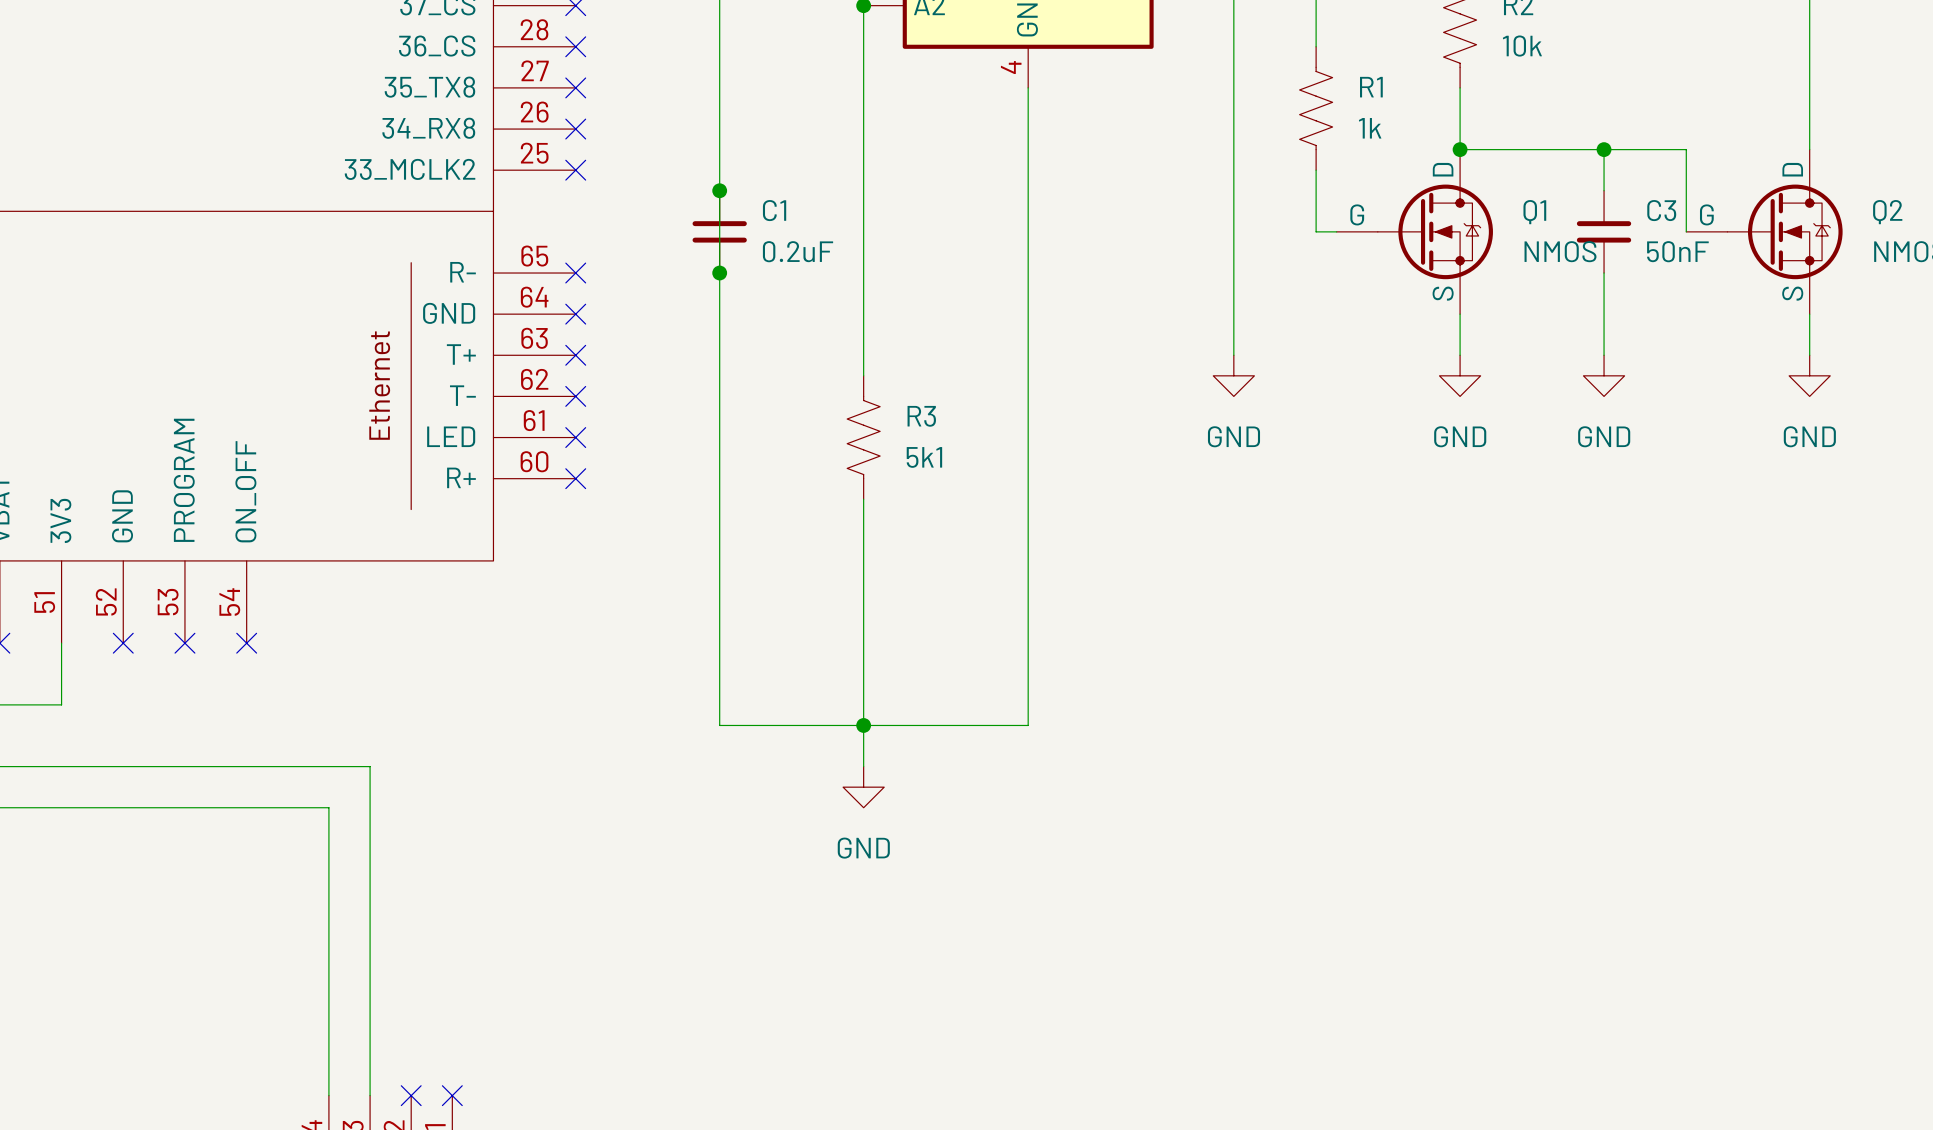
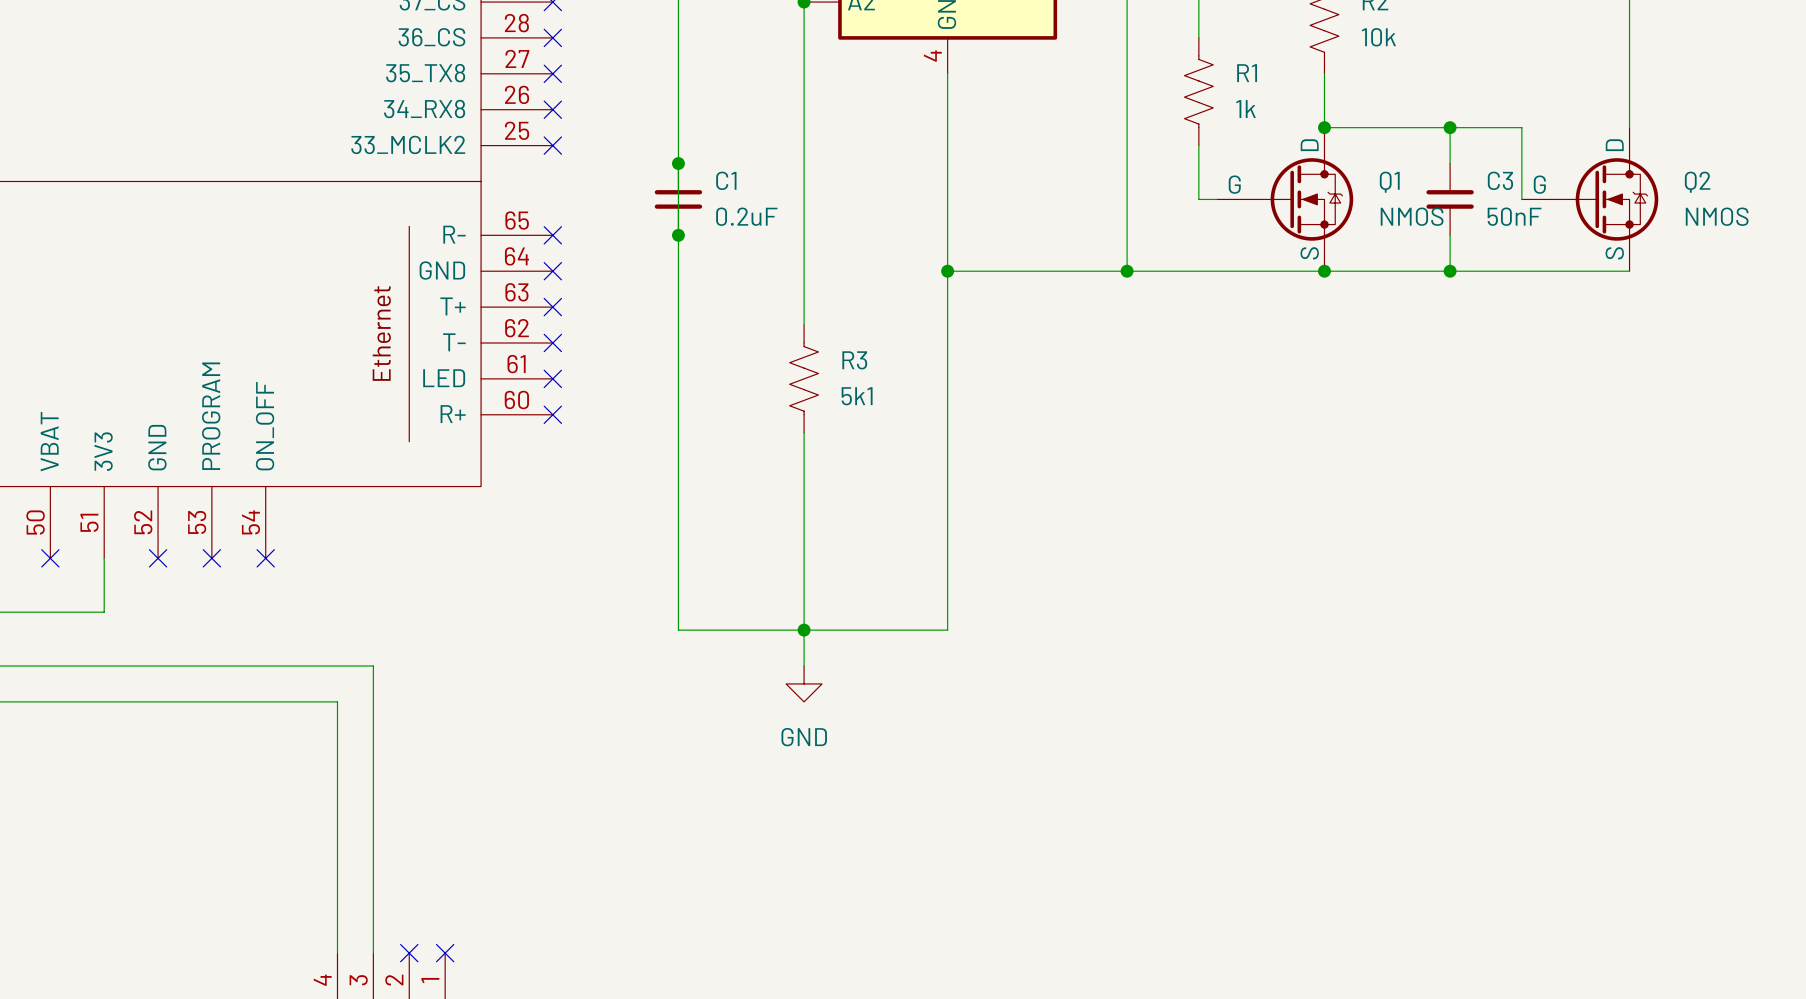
junction: none -> (947, 271)
wire: (1233, 314) (1233, 355) -> none
junction: none -> (1127, 271)
wire: (1460, 314) (1460, 355) -> none
junction: none -> (1324, 271)
wire: (1604, 314) (1604, 355) -> none
junction: none -> (1450, 271)
wire: (1809, 314) (1809, 355) -> (1629, 271) (947, 271)
power symbol: GND (1233, 375) -> none
power symbol: GND (1460, 375) -> none
power symbol: GND (1604, 375) -> none
power symbol: GND (1809, 375) -> none

